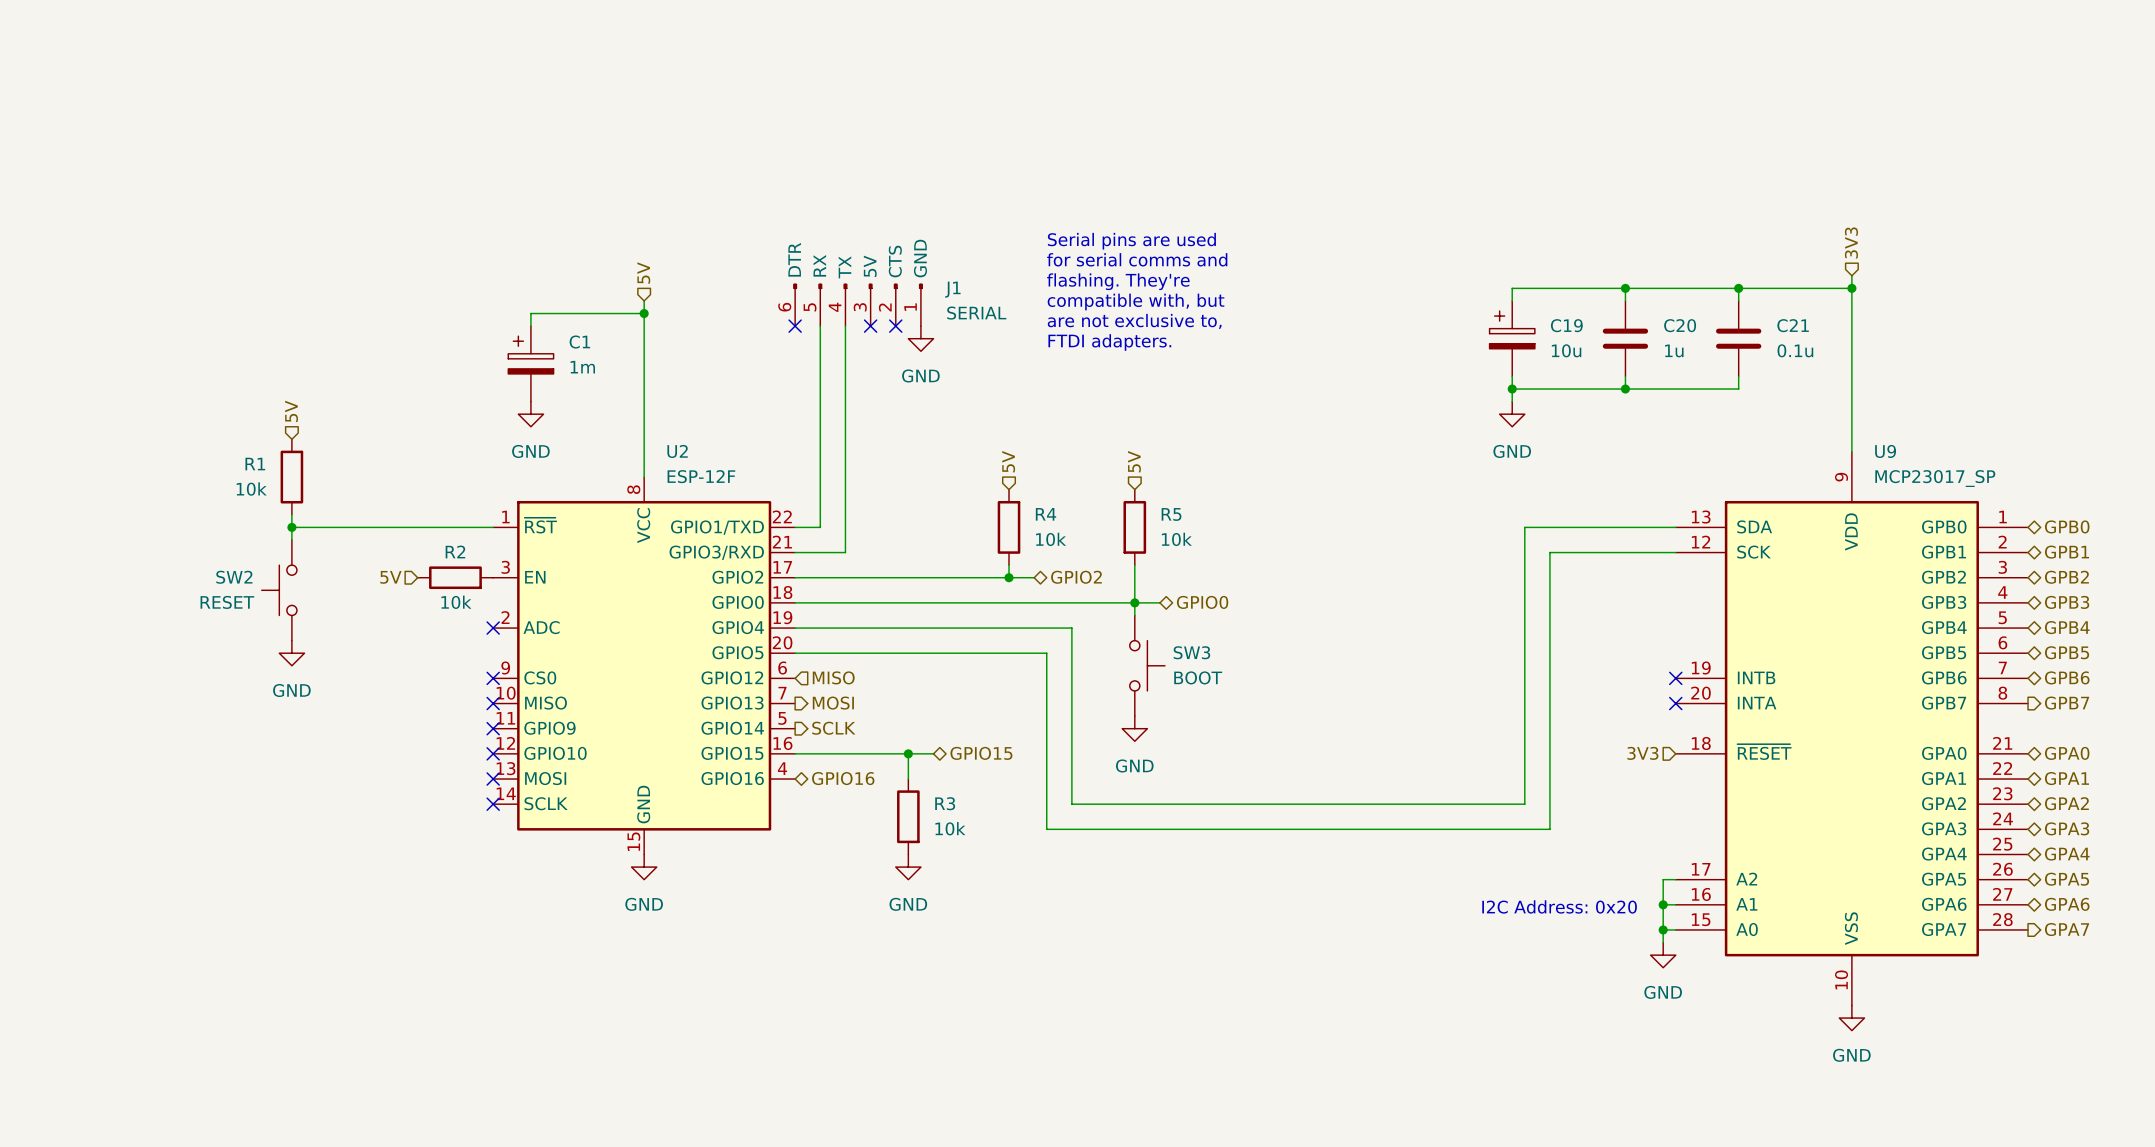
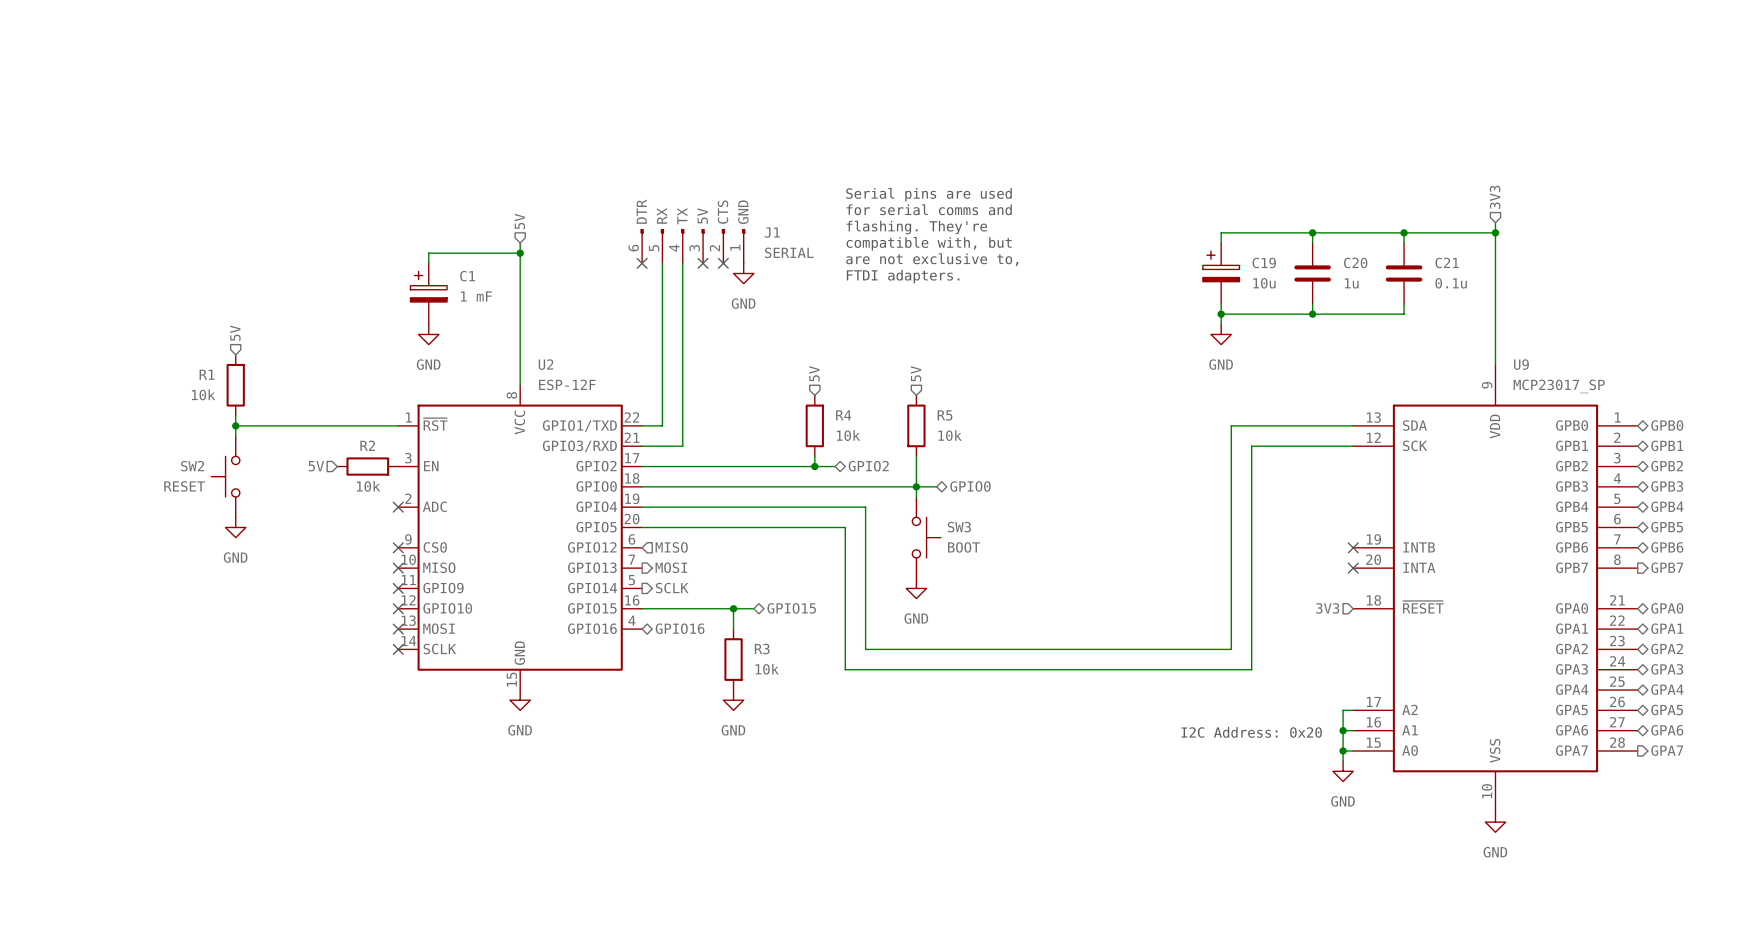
C1 value: 1m (582, 367) -> 1 mF (476, 296)

